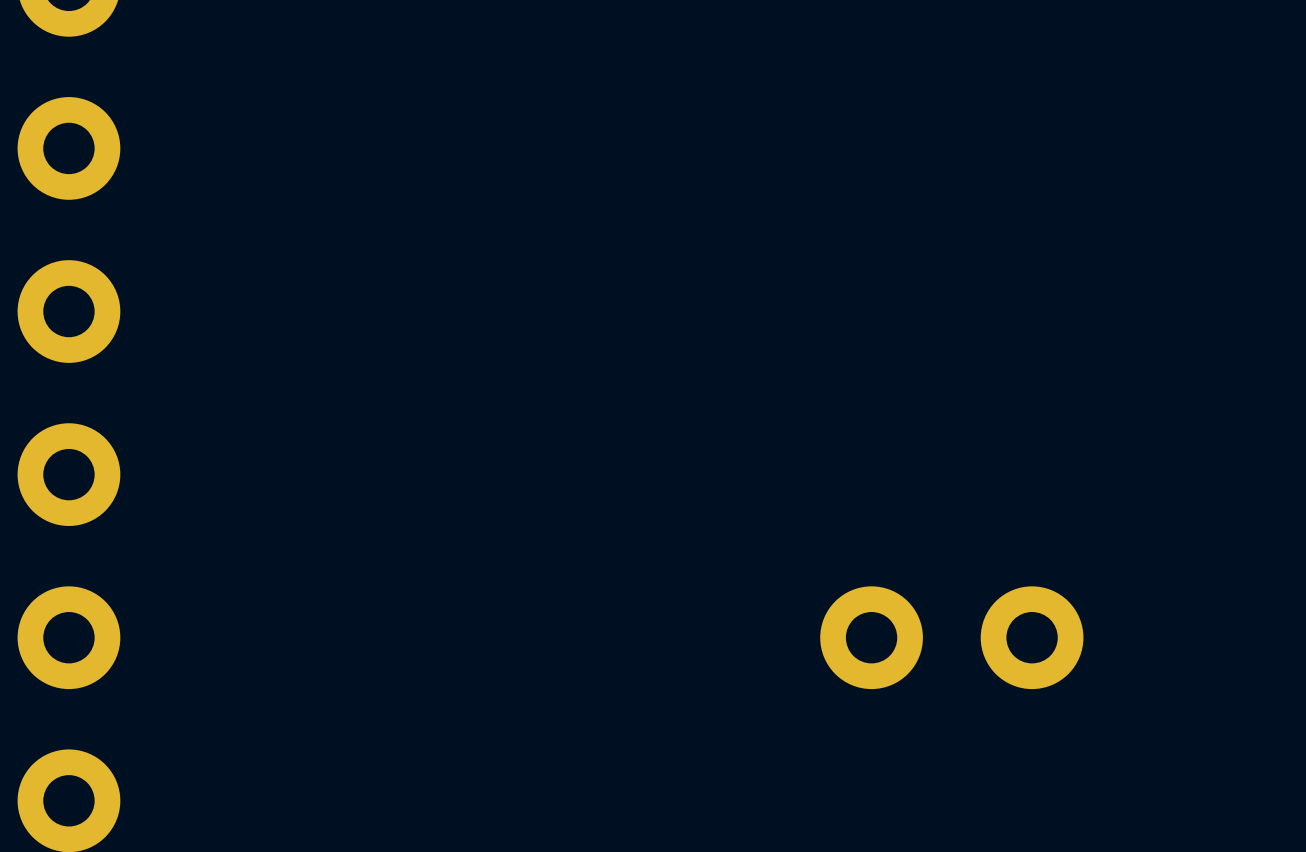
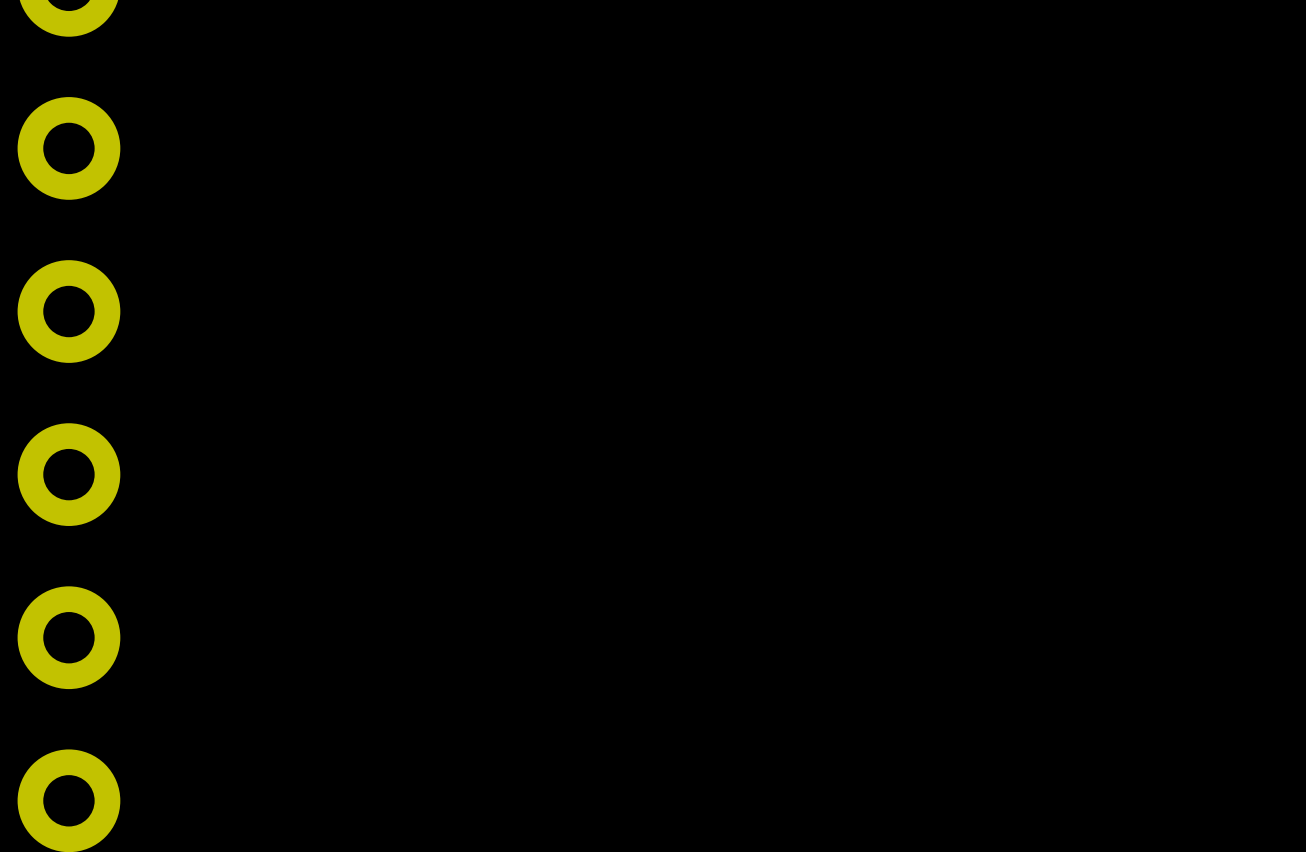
part: (951, 637) -> none

